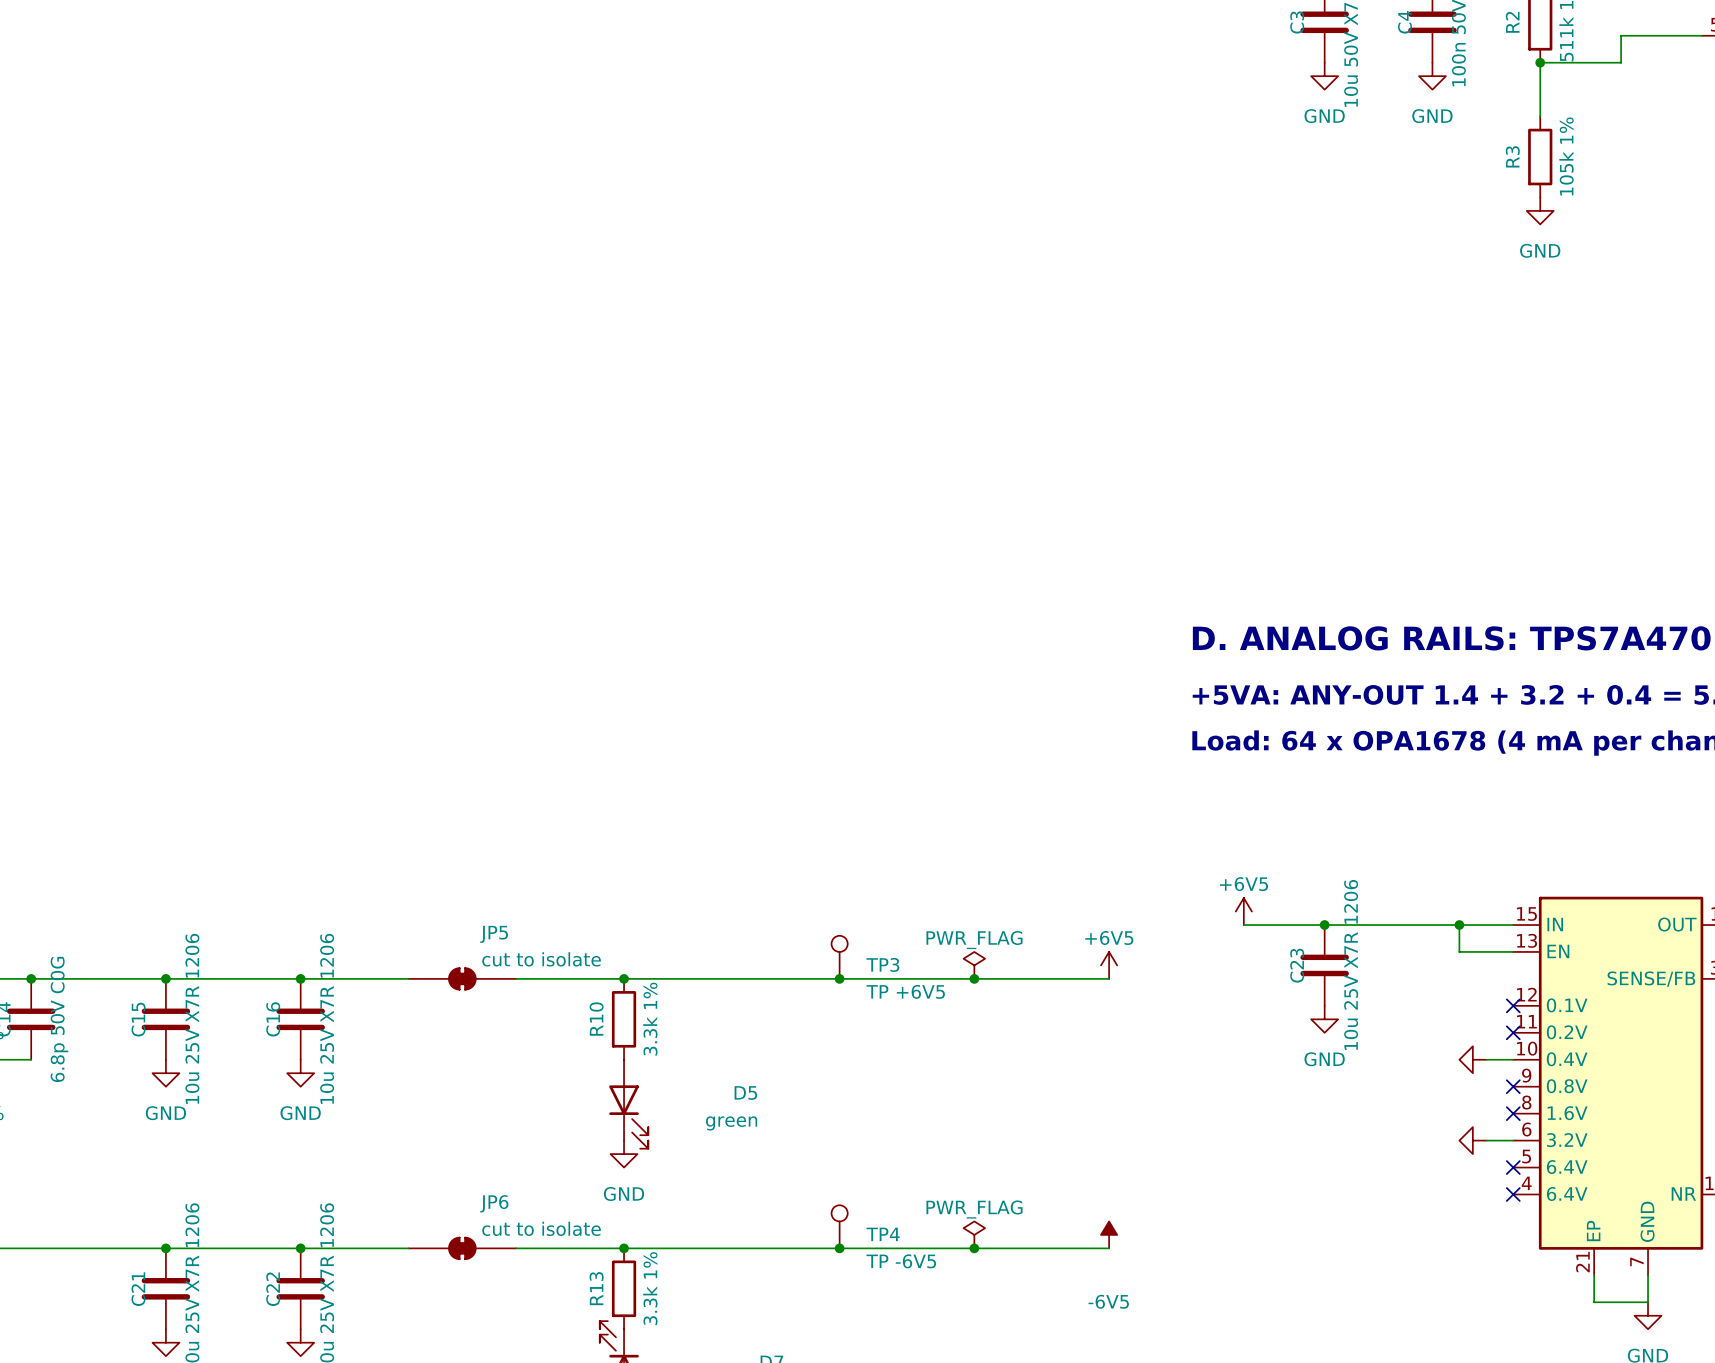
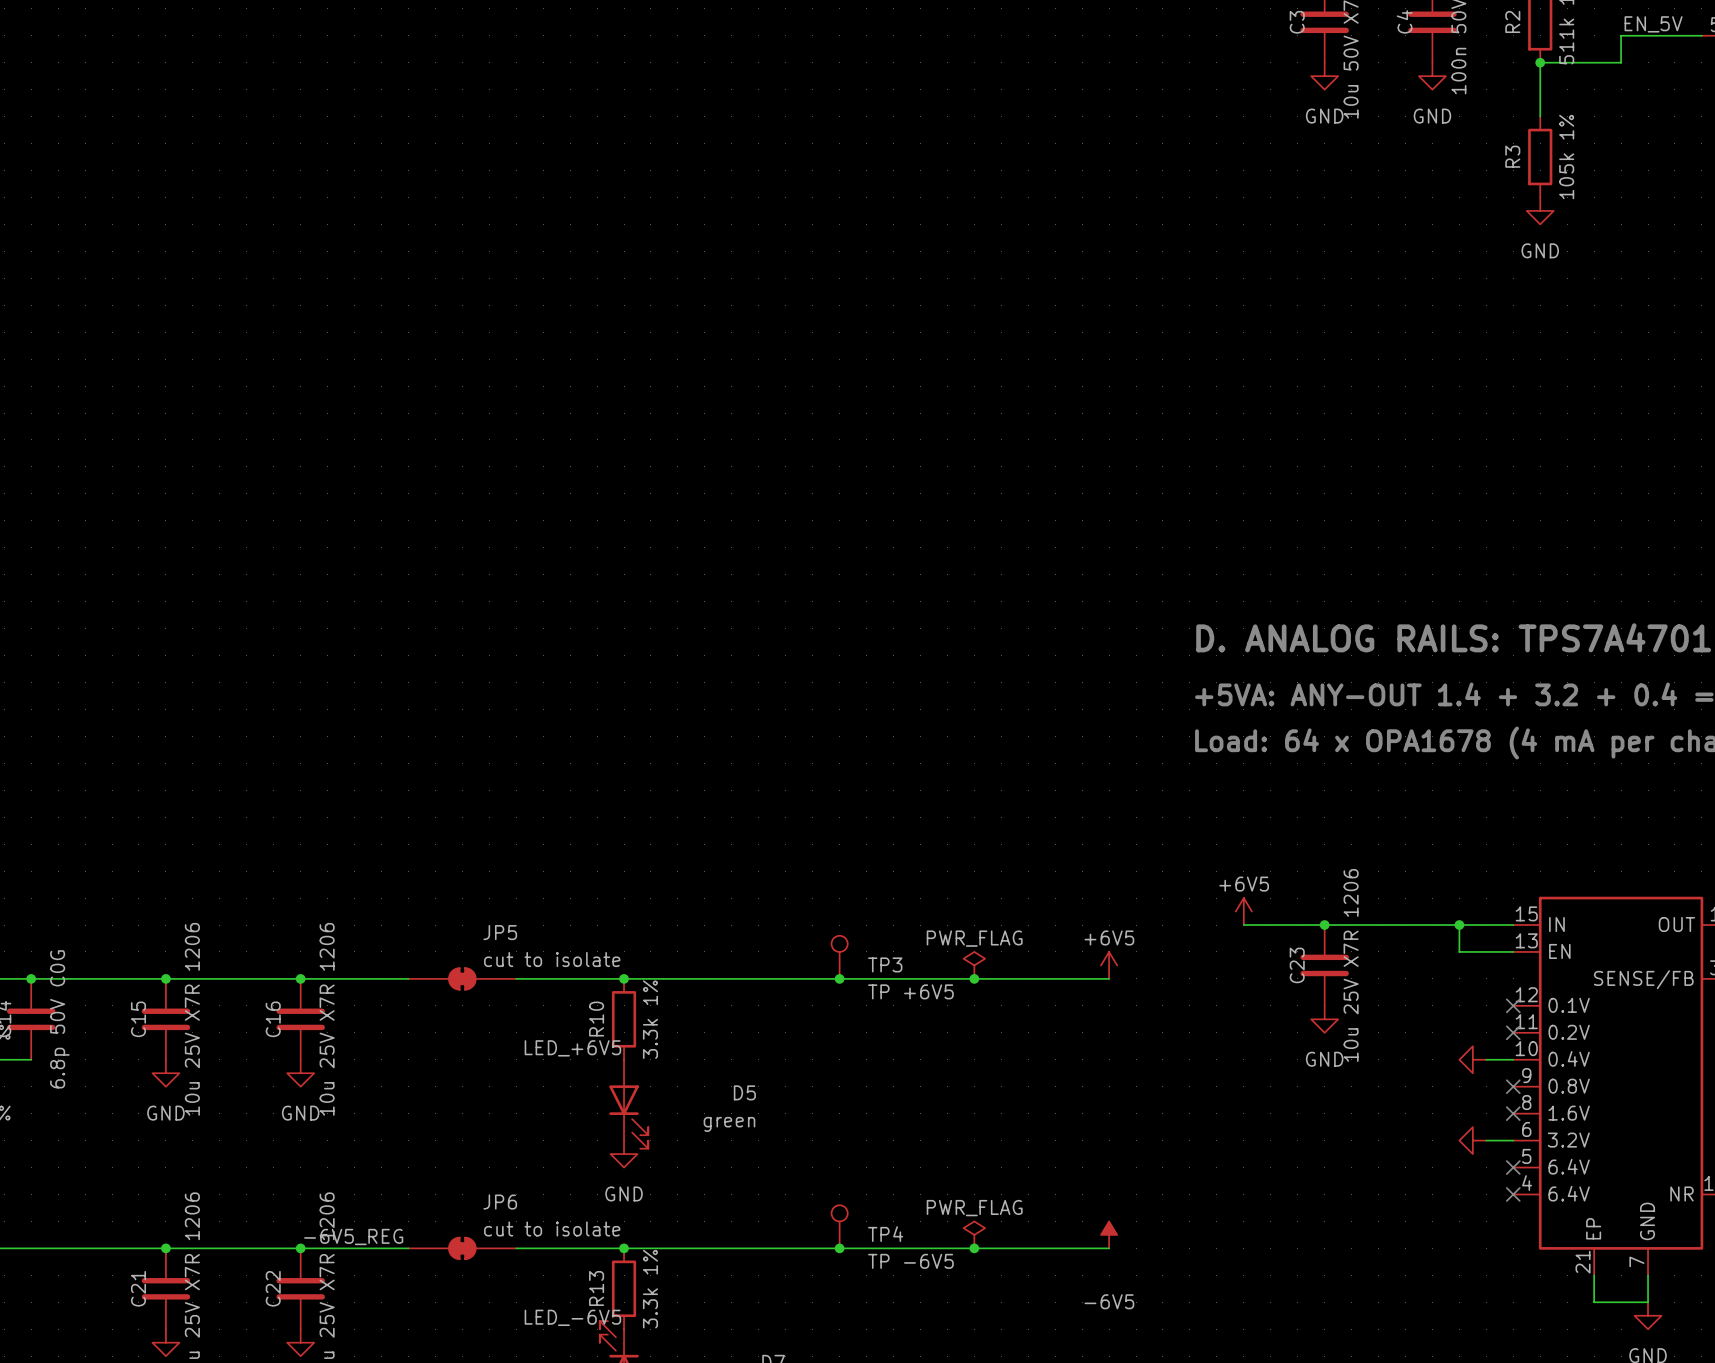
label: none -> EN_5V (1653, 24)
label: none -> LED_+6V5 (572, 1048)
label: none -> -6V5_REG (353, 1237)
label: none -> LED_-6V5 (572, 1317)

